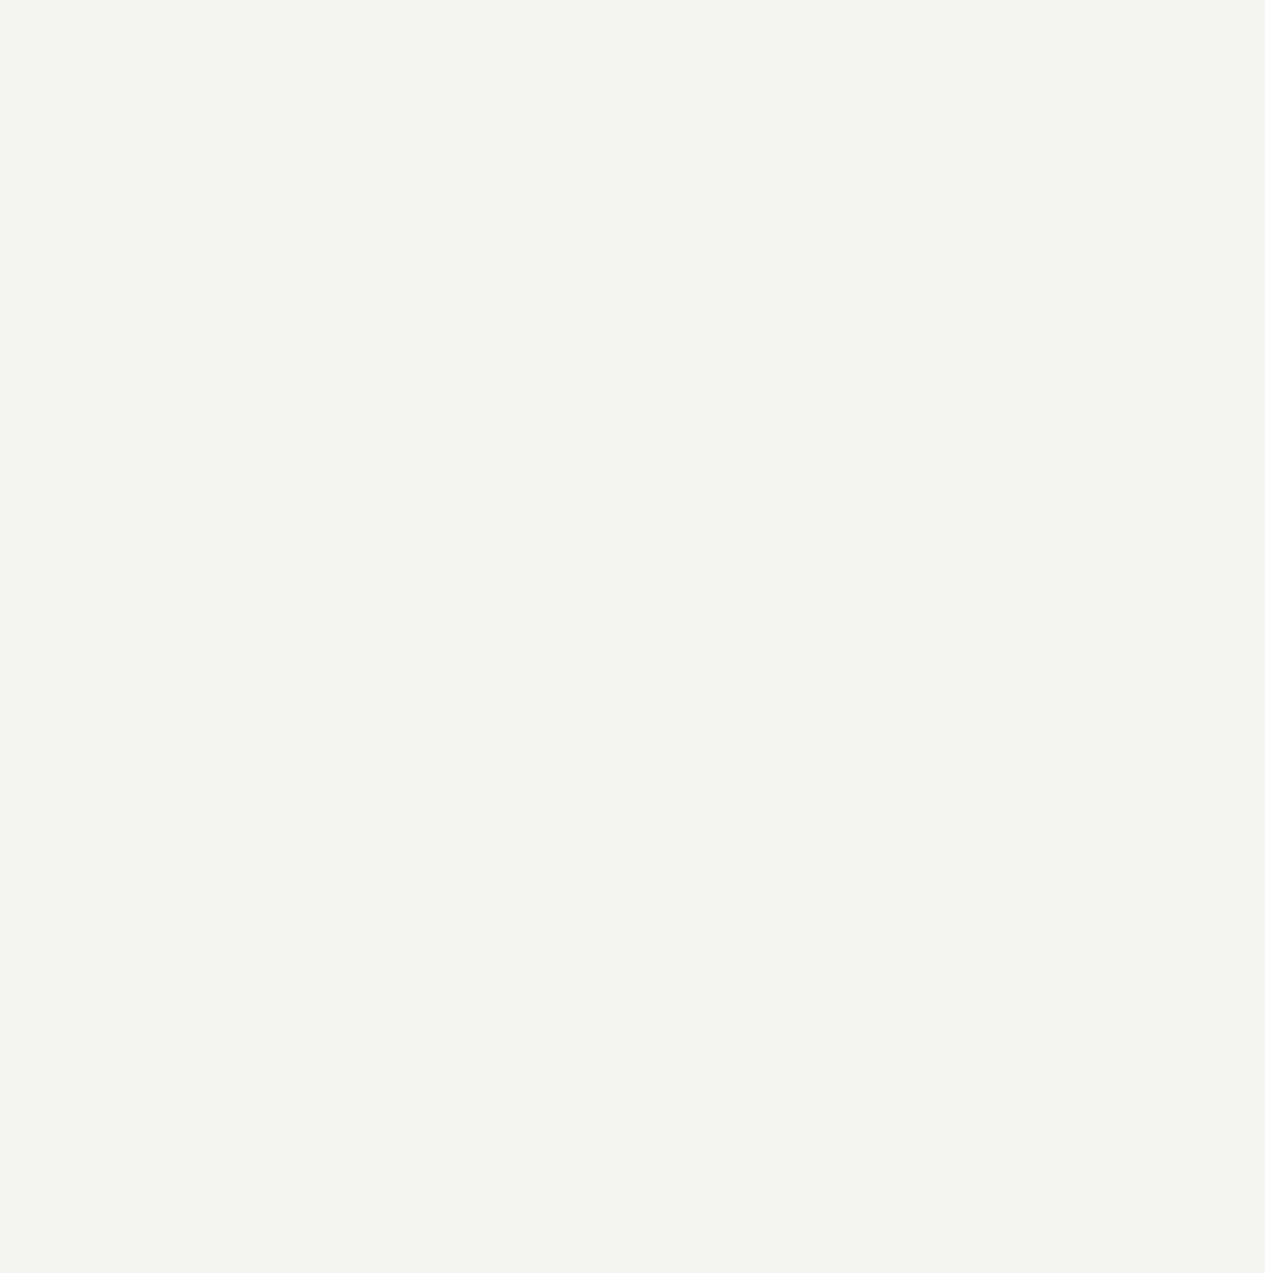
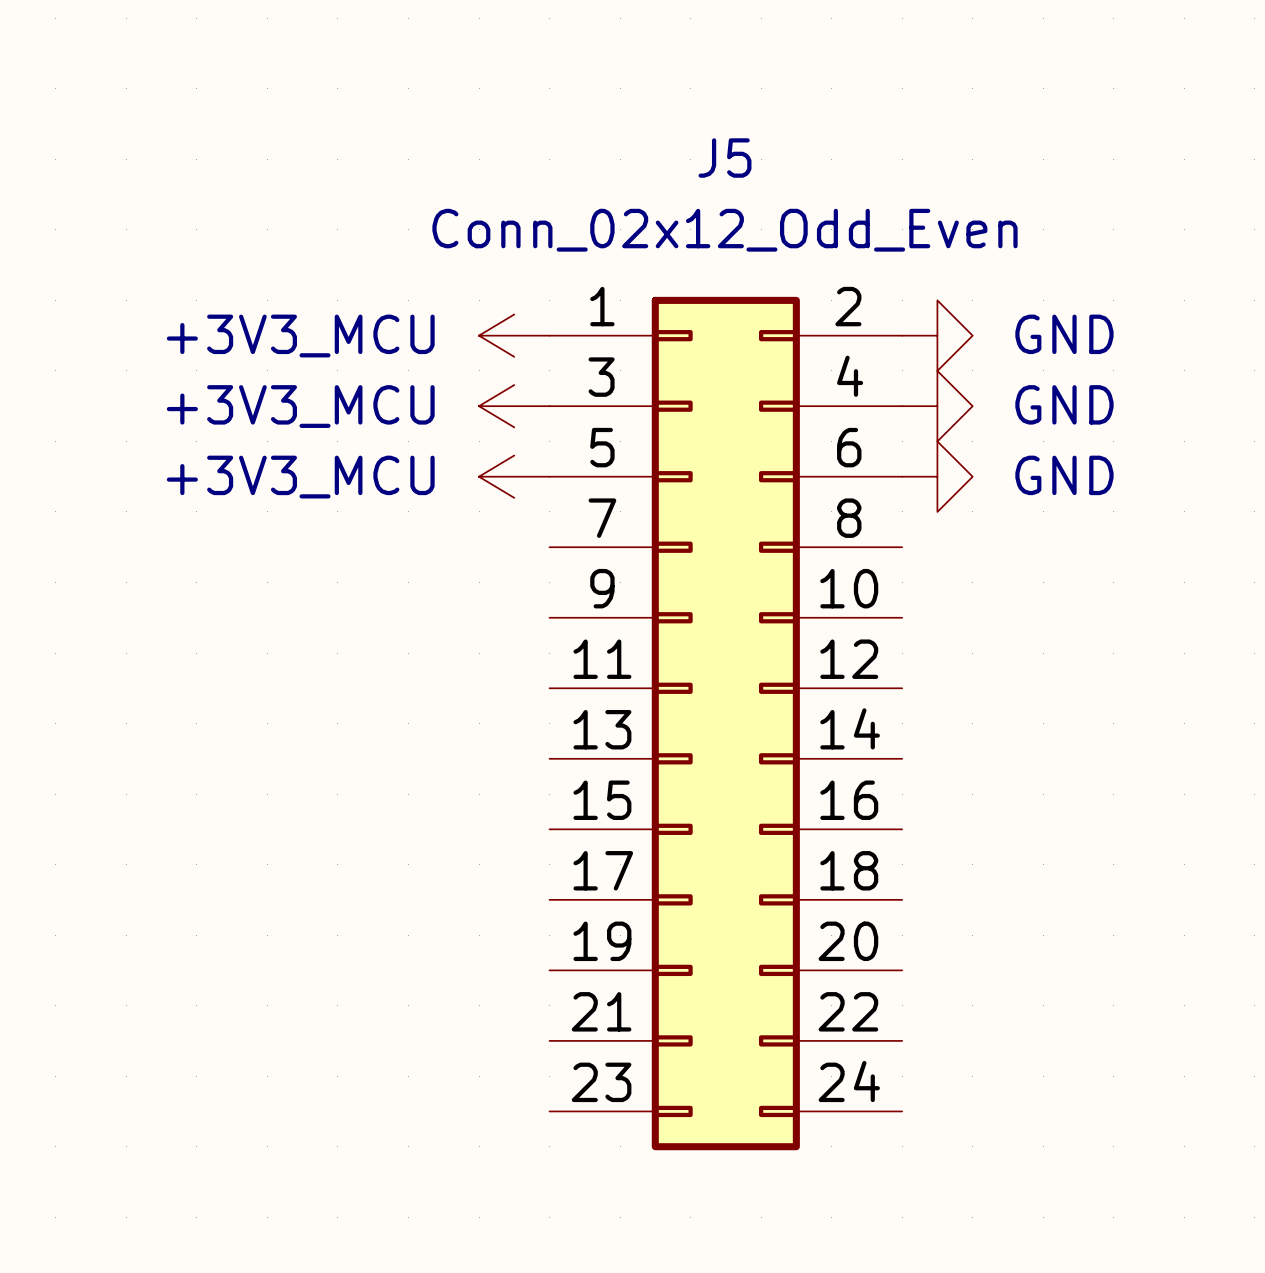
power symbol: none -> +3V3_MCU (514, 335)
power symbol: none -> GND (937, 335)
power symbol: none -> +3V3_MCU (514, 406)
power symbol: none -> GND (937, 406)
power symbol: none -> +3V3_MCU (514, 476)
power symbol: none -> GND (937, 476)
J5: none -> Conn_02x12_Odd_Even (725, 723)

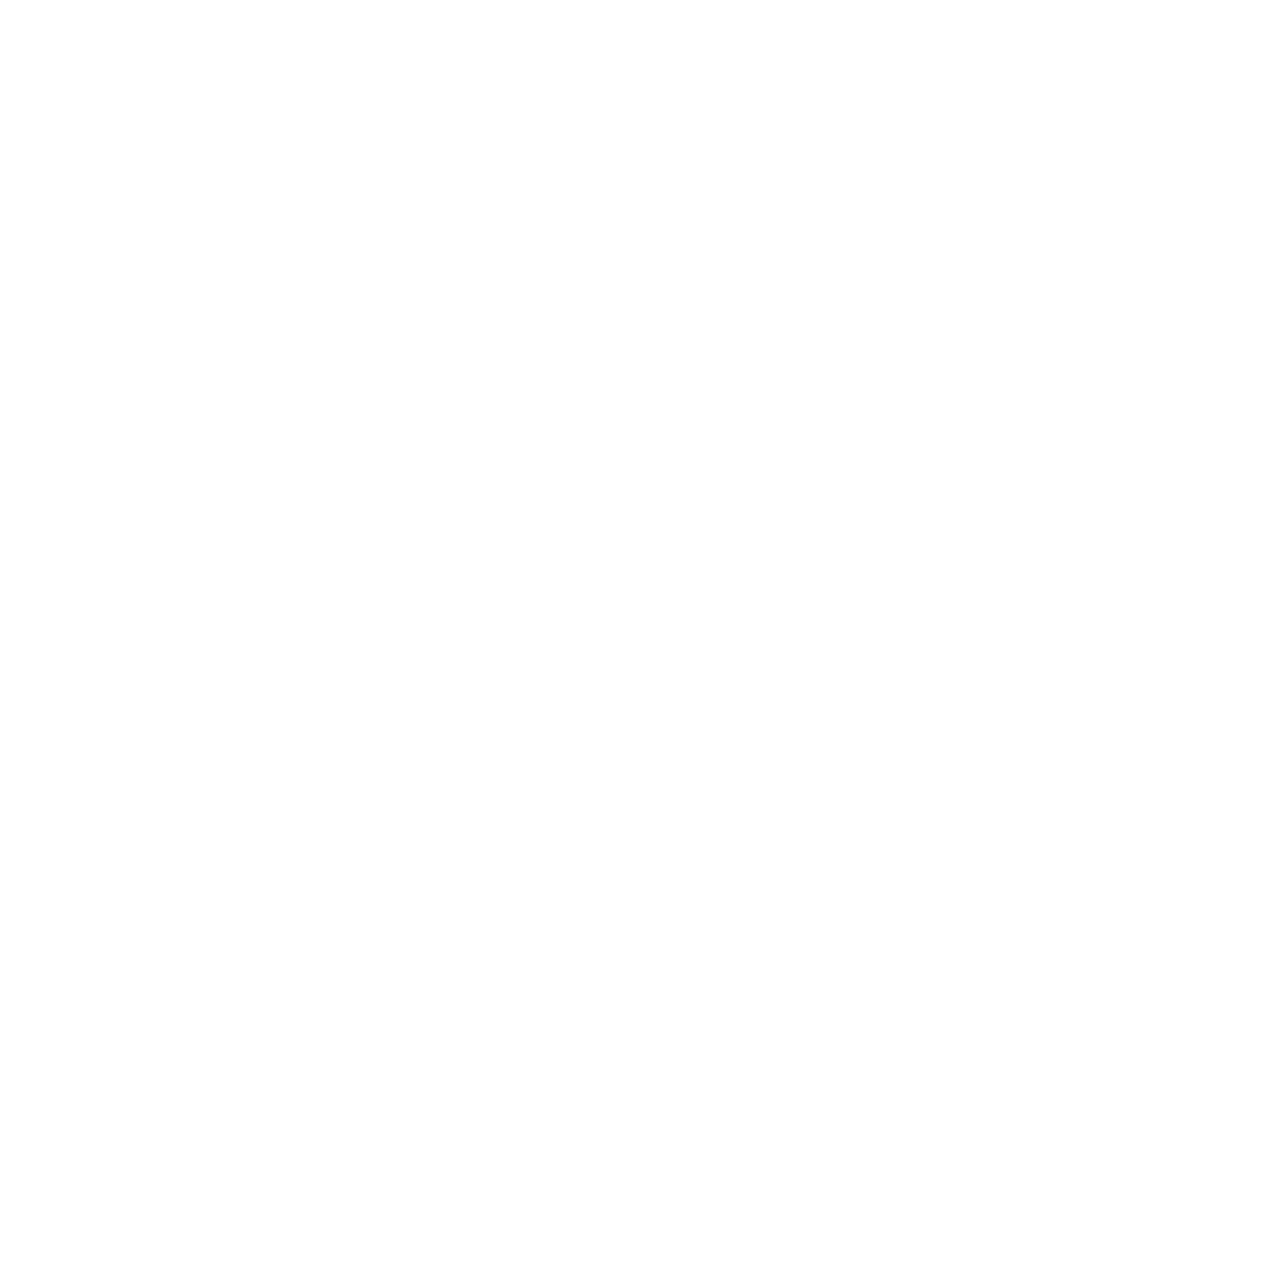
power symbol: +3V3_MCU (514, 335) -> none
power symbol: GND (937, 335) -> none
power symbol: +3V3_MCU (514, 406) -> none
power symbol: GND (937, 406) -> none
power symbol: +3V3_MCU (514, 476) -> none
power symbol: GND (937, 476) -> none
J5: Conn_02x12_Odd_Even (725, 723) -> none

